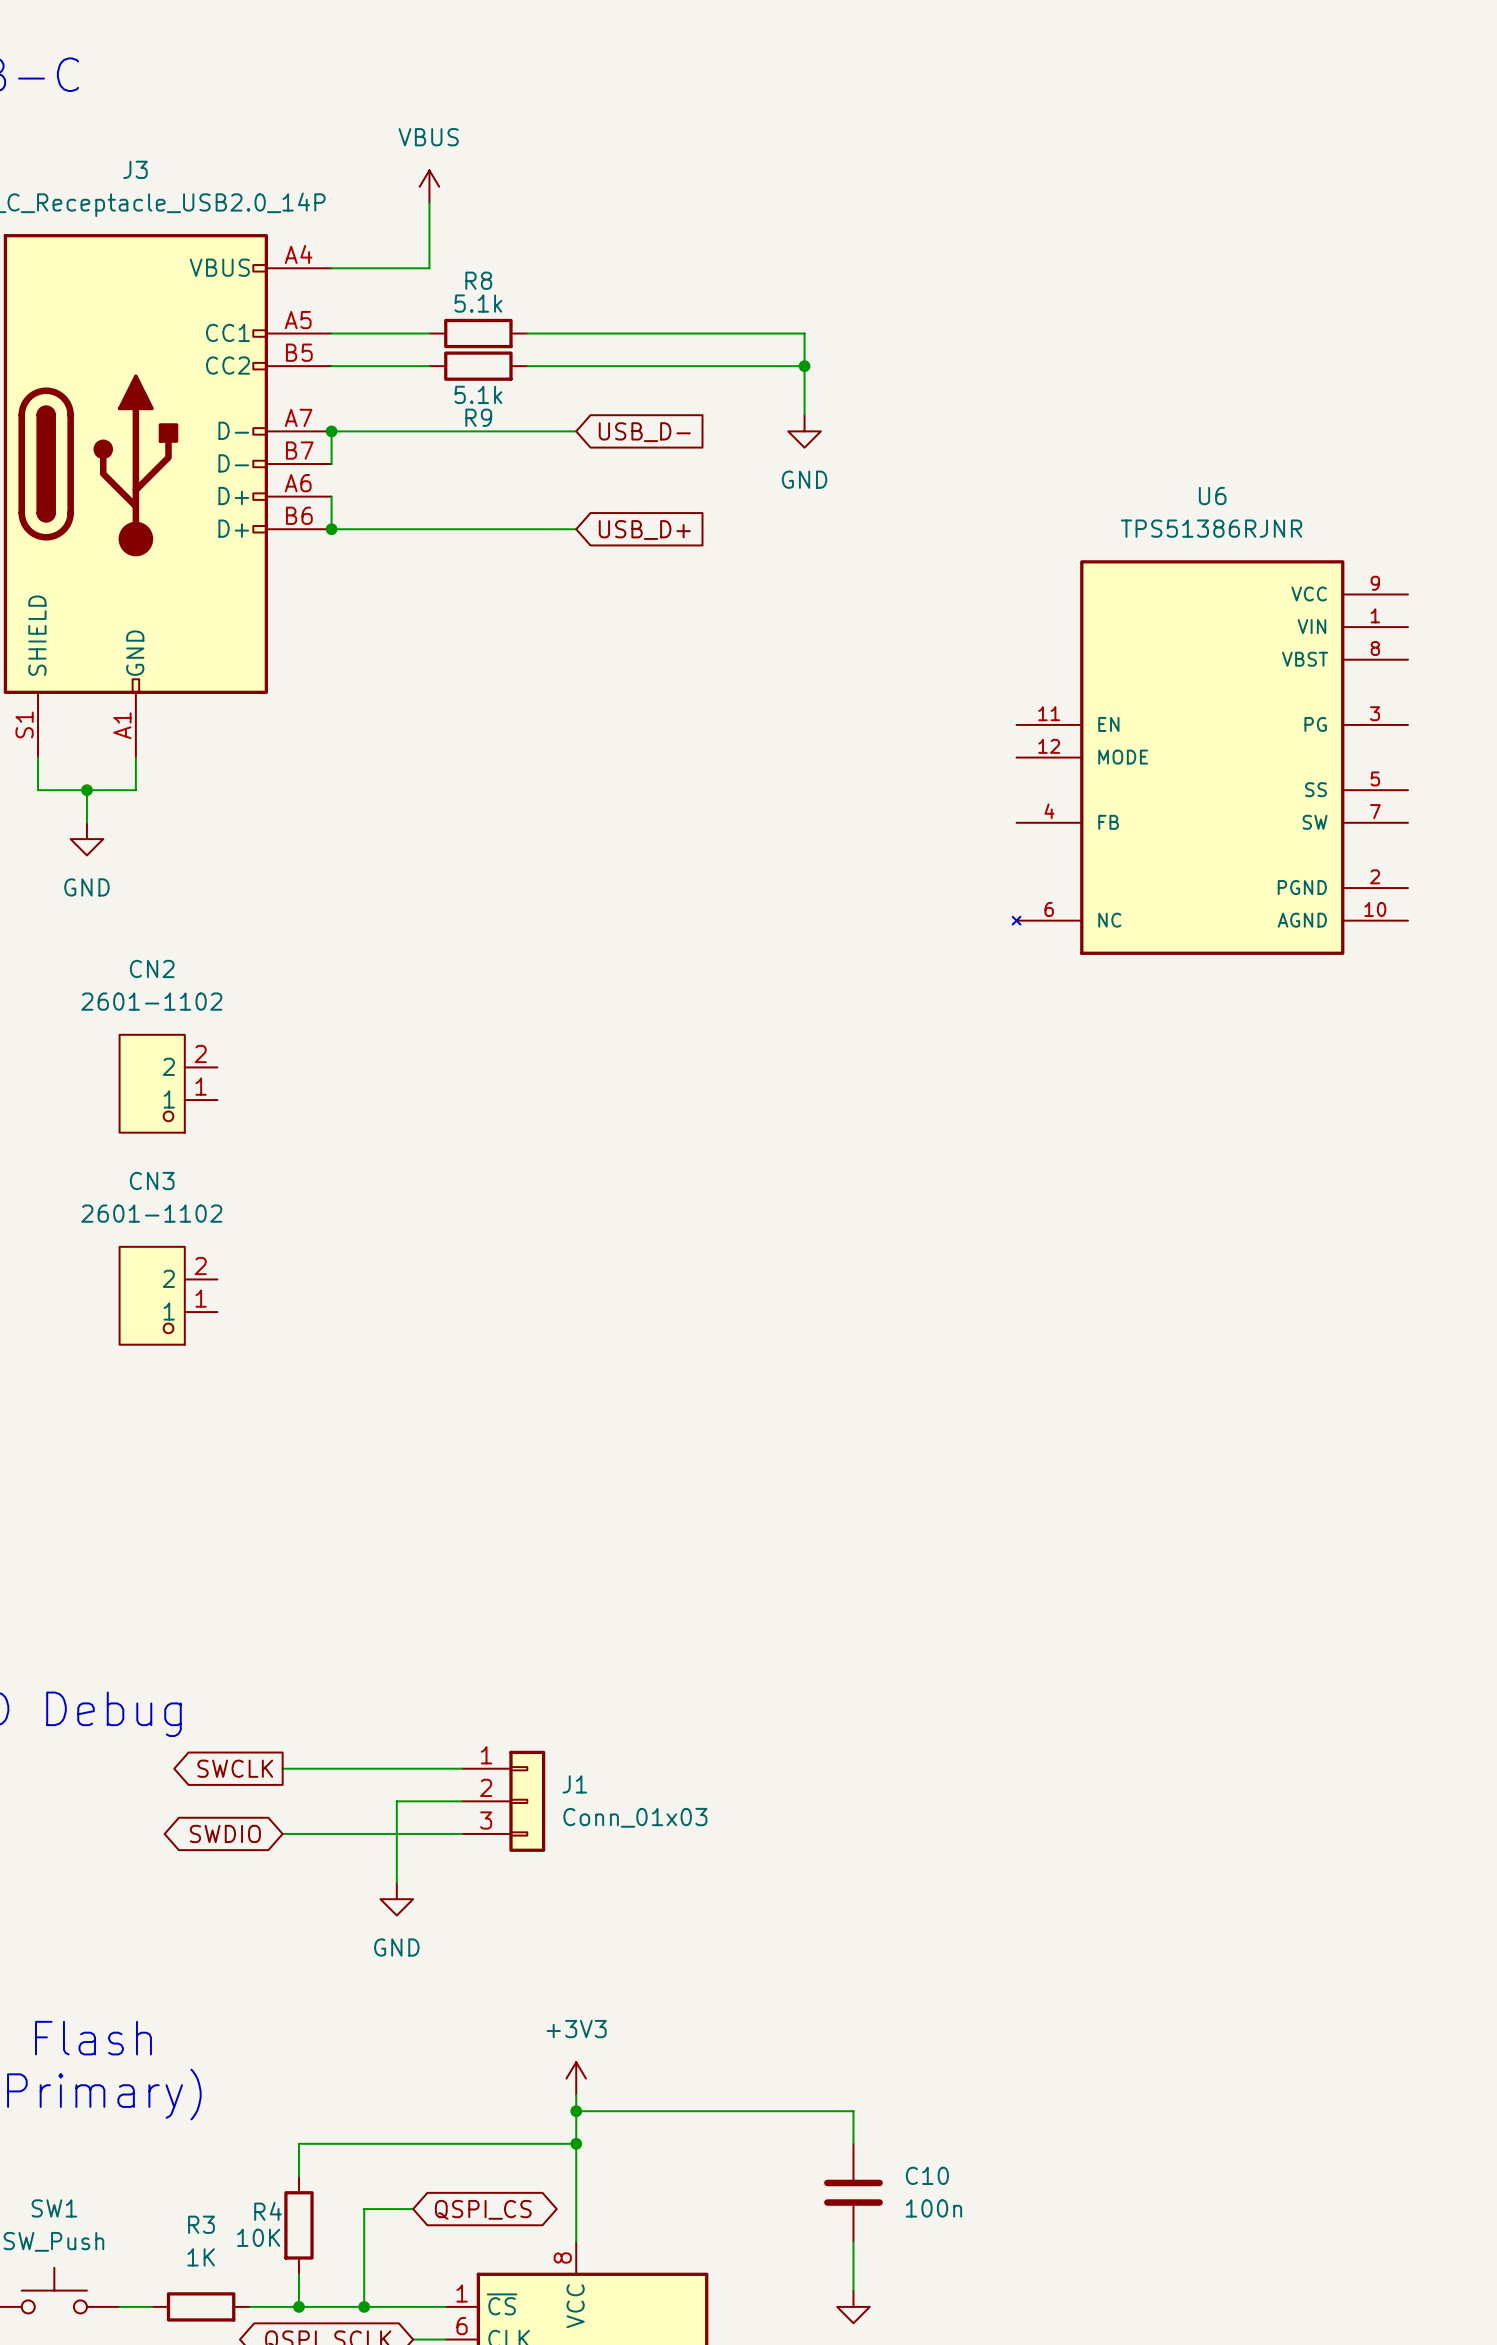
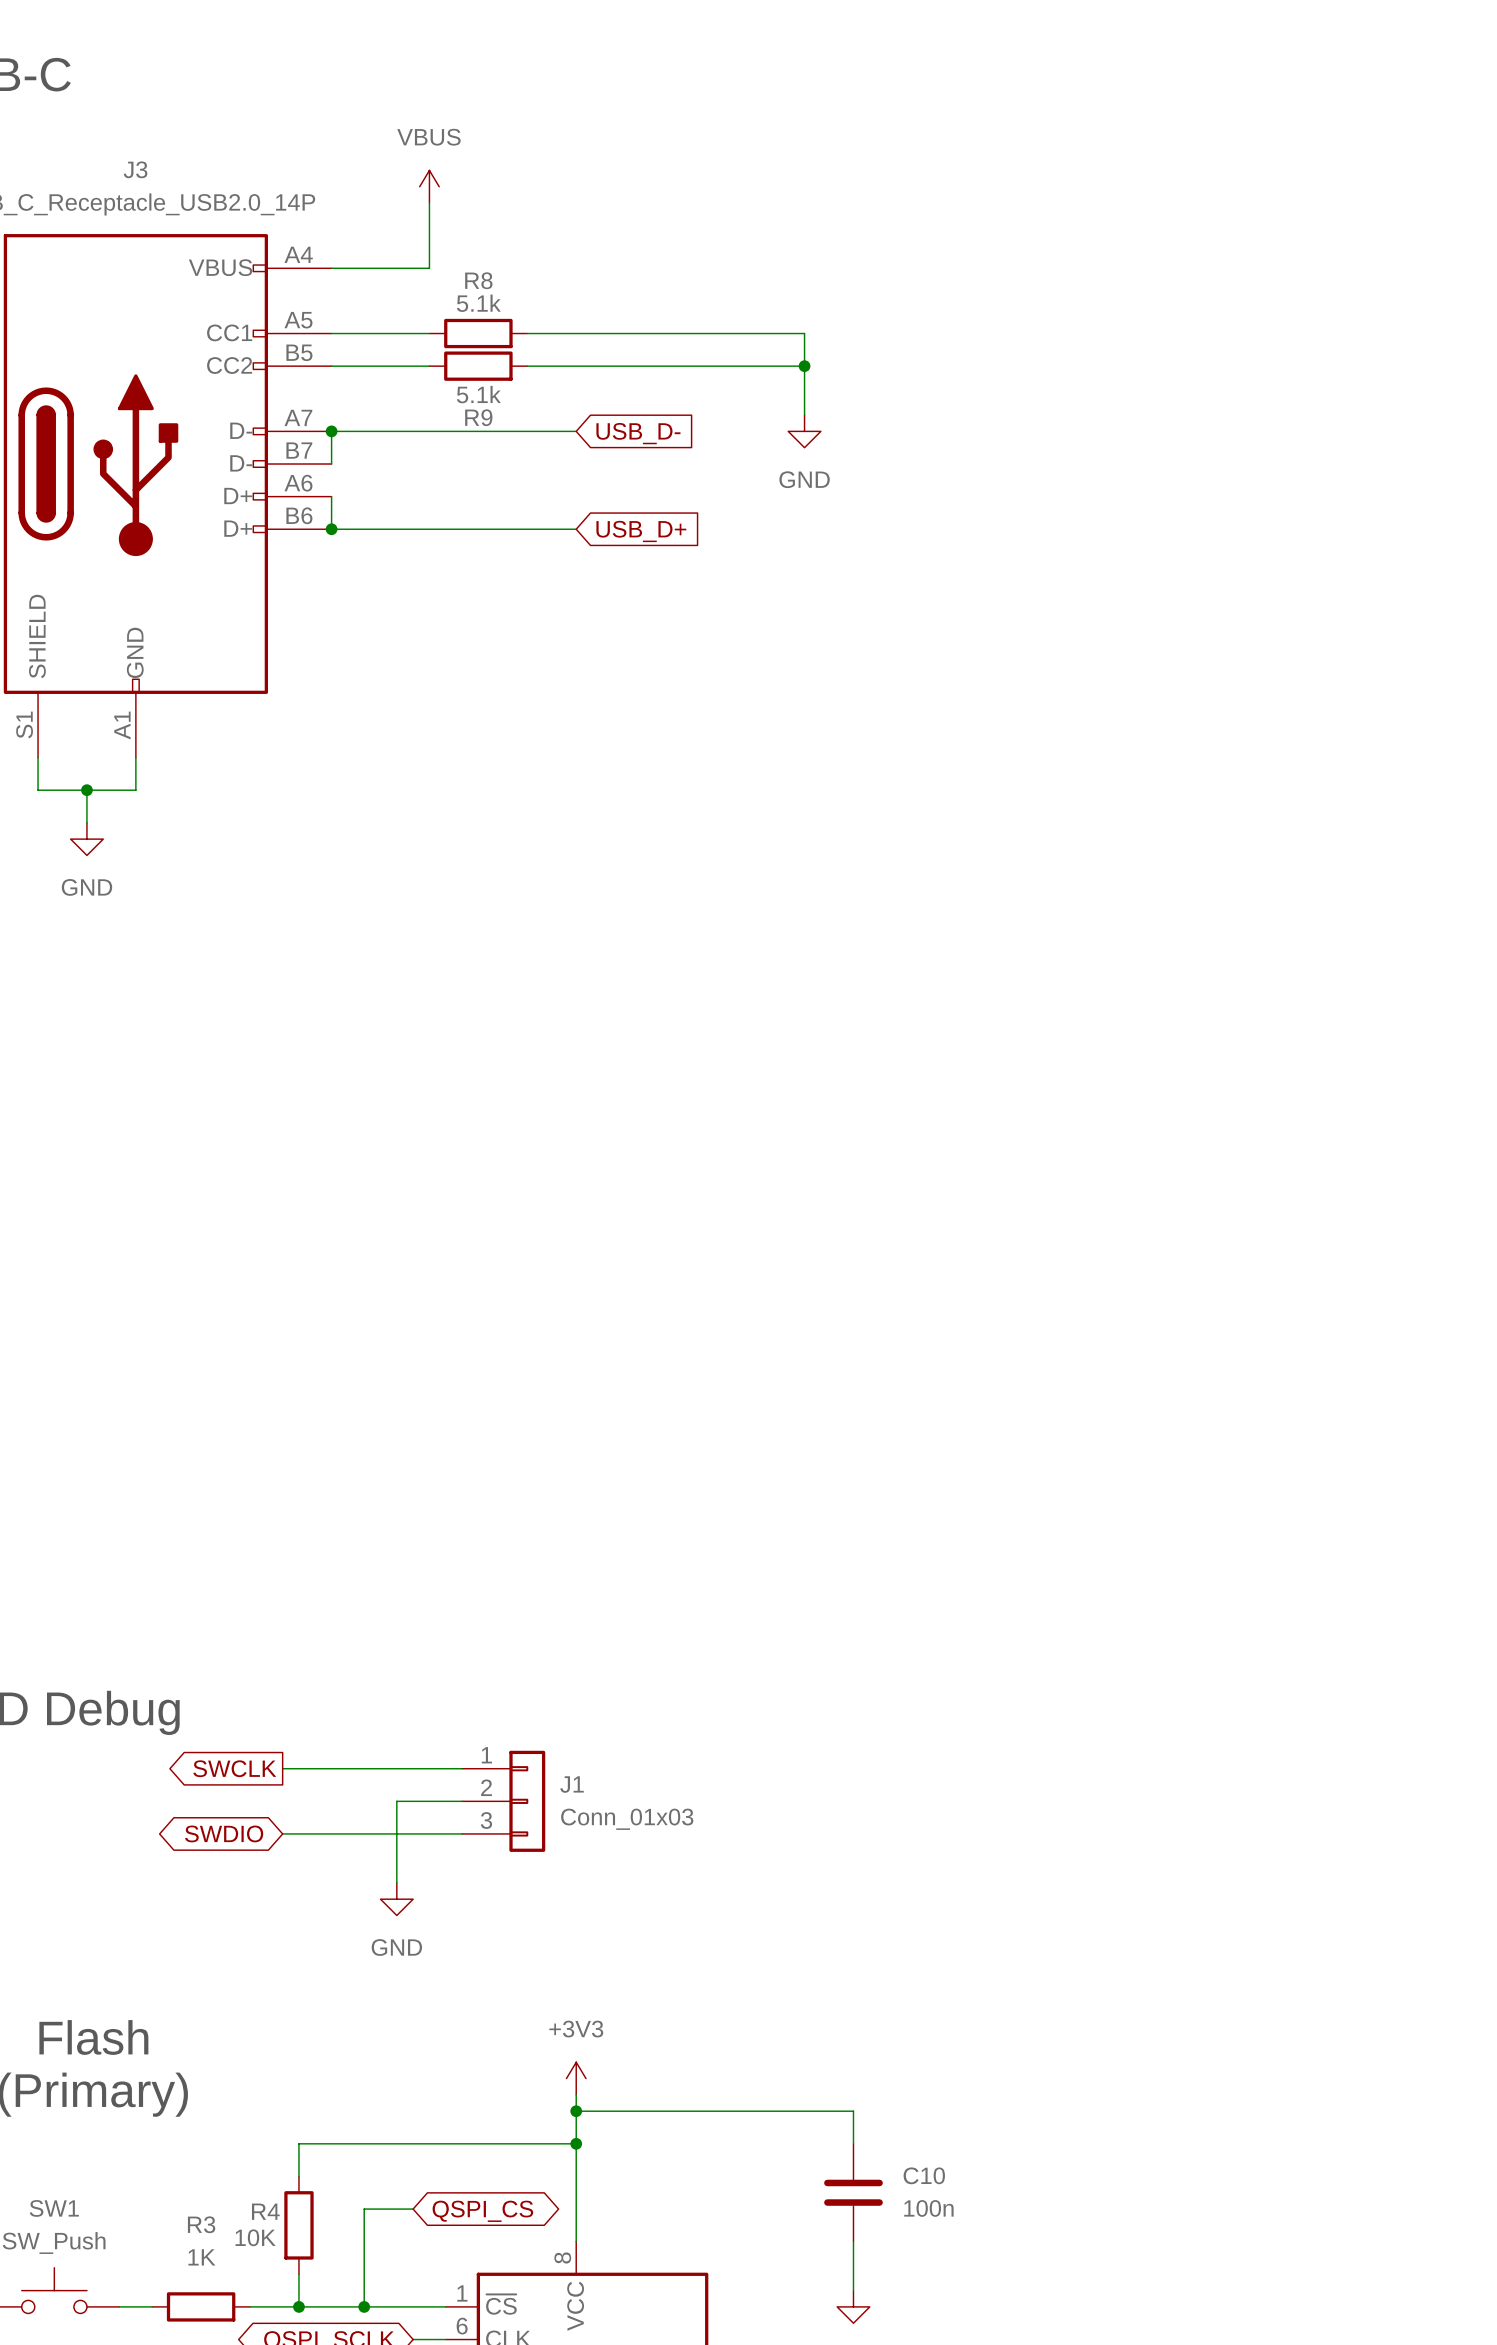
U6: TPS51386RJNR (1210, 757) -> none
CN2: 2601-1102 (168, 1083) -> none
CN3: 2601-1102 (168, 1295) -> none

